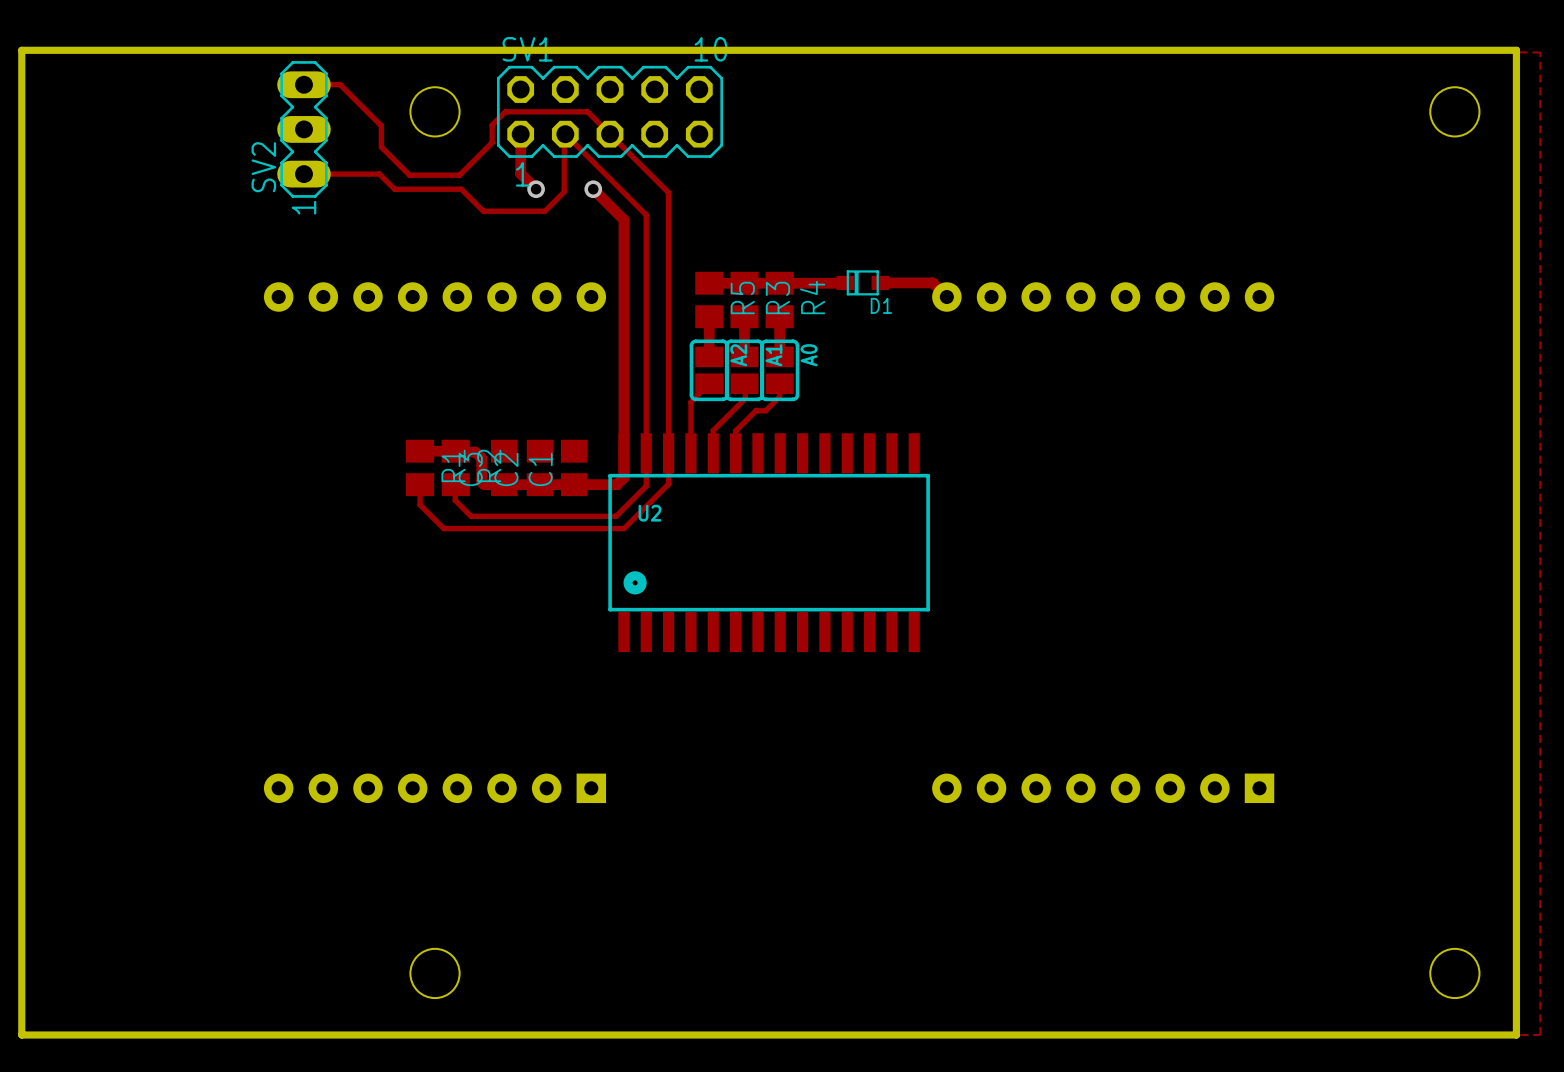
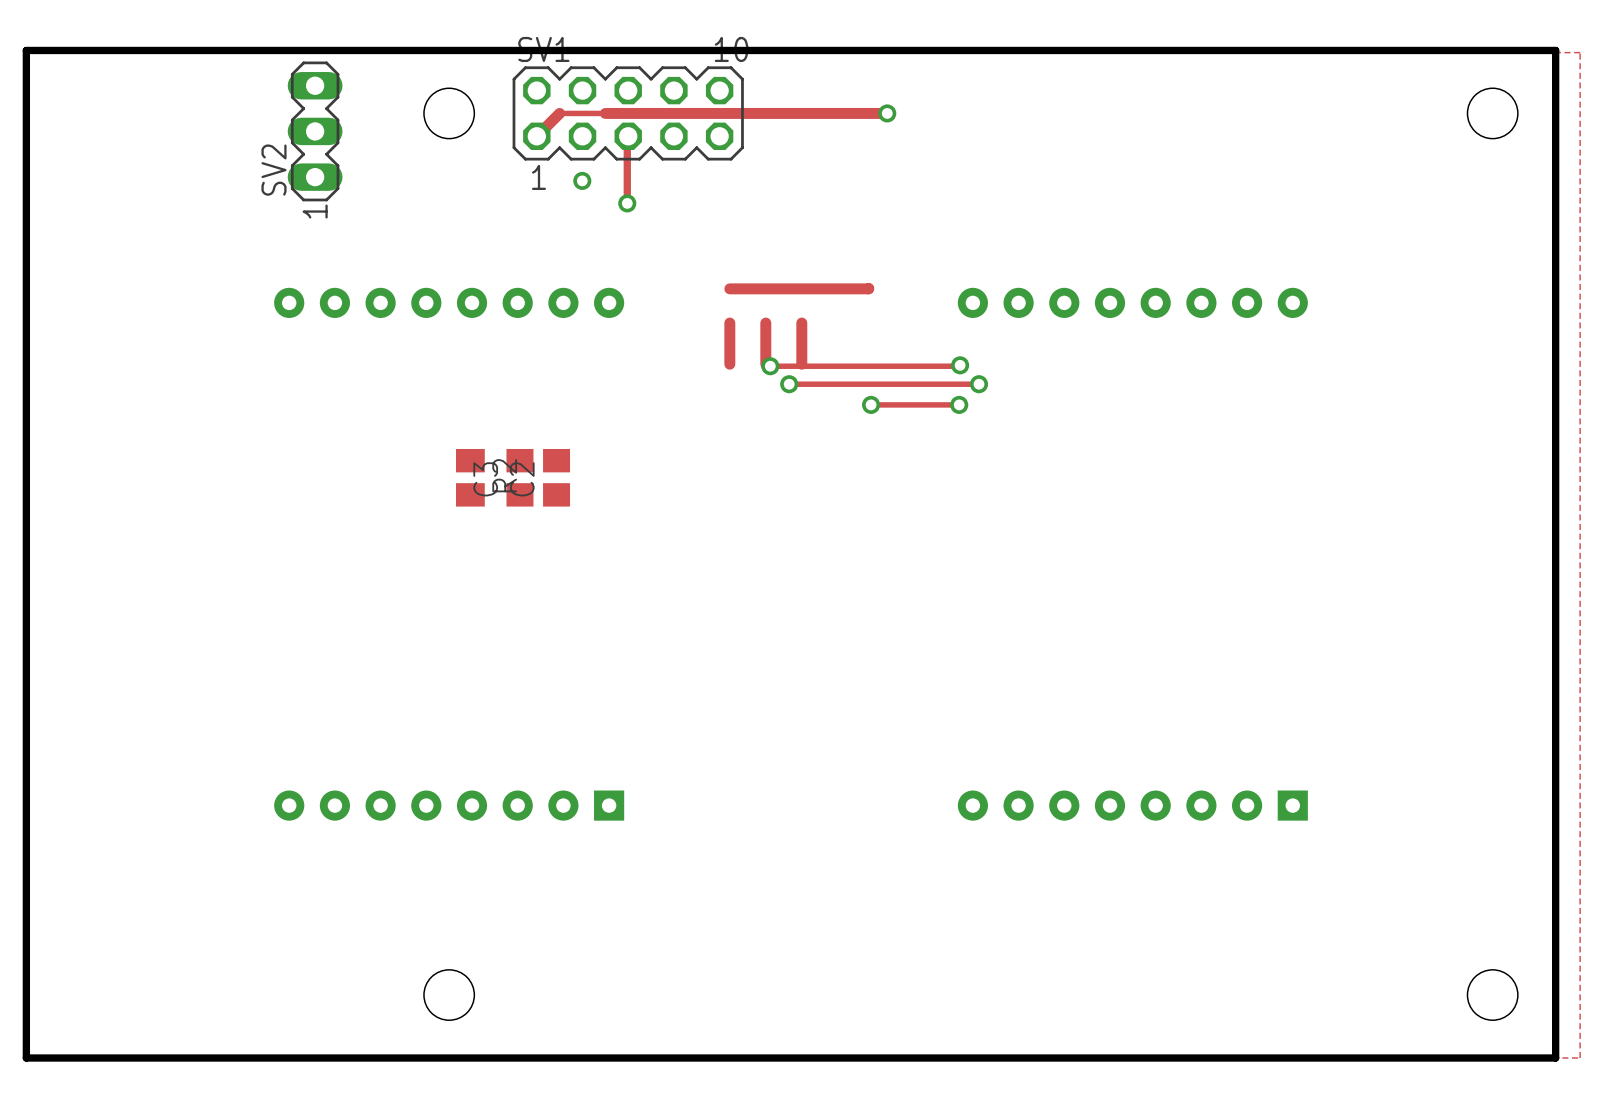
track: (304, 84) (340, 84) (381, 125) (381, 147) (409, 175) (459, 175) (492, 142) (492, 125) (505, 111) (543, 111) -> none
track: (587, 111) (668, 192) (668, 484) (624, 528) (443, 528) (420, 504) (420, 484) -> (605, 113) (887, 113)
via: none -> (887, 113)
track: (520, 134) (520, 173) (536, 189) -> (536, 136) (559, 113)
track: none -> (628, 136) (627, 203)
track: (303, 174) (379, 174) (394, 189) (461, 189) (483, 211) (544, 211) (564, 191) (565, 134) (646, 215) (646, 486) (616, 516) (471, 516) (455, 500) (455, 484) -> none
via: none -> (582, 180)
via: (536, 189) -> none
track: (593, 189) (623, 219) (623, 477) (616, 484) (484, 484) (481, 481) (481, 458) (475, 452) (420, 451) -> none
via: (593, 189) -> none
via: none -> (627, 203)
D1: (862, 282) -> none
track: (880, 282) (932, 282) (946, 297) -> none
R5: (709, 299) -> none
R3: (744, 299) -> none
R4: (779, 299) -> none
via: none -> (770, 366)
track: none -> (960, 365) (770, 366)
via: none -> (960, 365)
A2: (709, 370) -> none
A1: (744, 370) -> none
A0: (779, 370) -> none
track: none -> (789, 384) (979, 384)
via: none -> (789, 384)
via: none -> (979, 384)
track: (709, 383) (690, 402) (690, 453) -> none
track: (744, 383) (745, 398) (713, 430) (713, 453) -> none
track: (779, 383) (779, 396) (765, 410) (755, 410) (735, 430) (735, 453) -> none
track: none -> (871, 404) (959, 404)
via: none -> (871, 404)
via: none -> (959, 404)
R1: (420, 467) -> none
C1: (574, 467) -> none
U2: (769, 542) -> none

